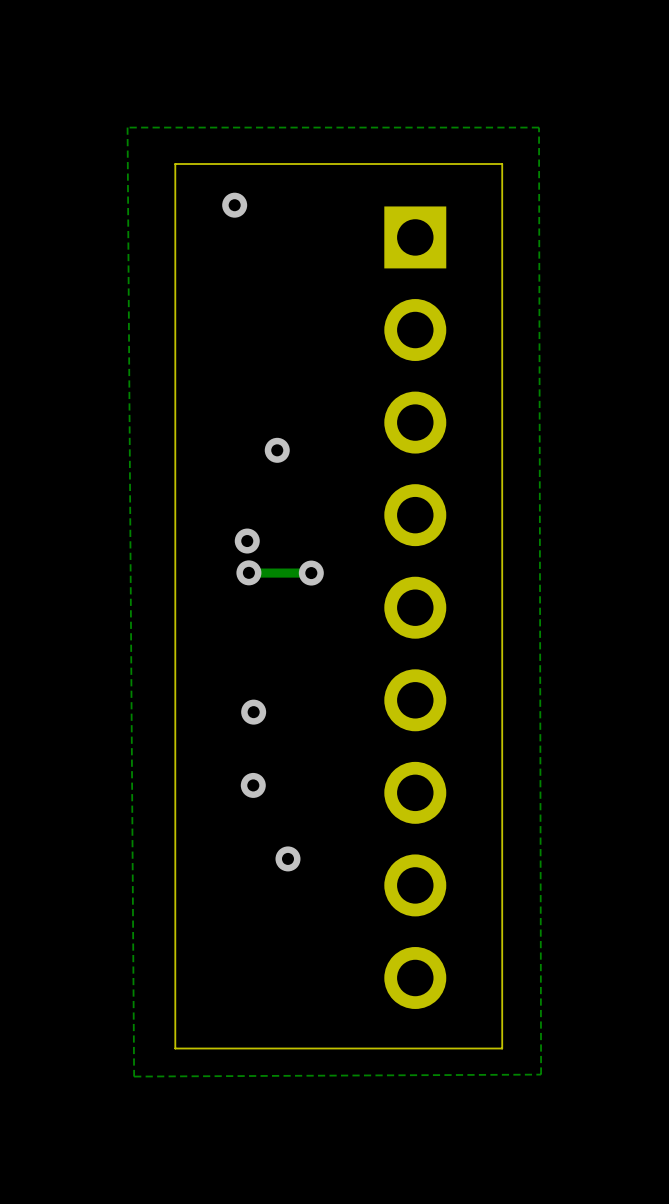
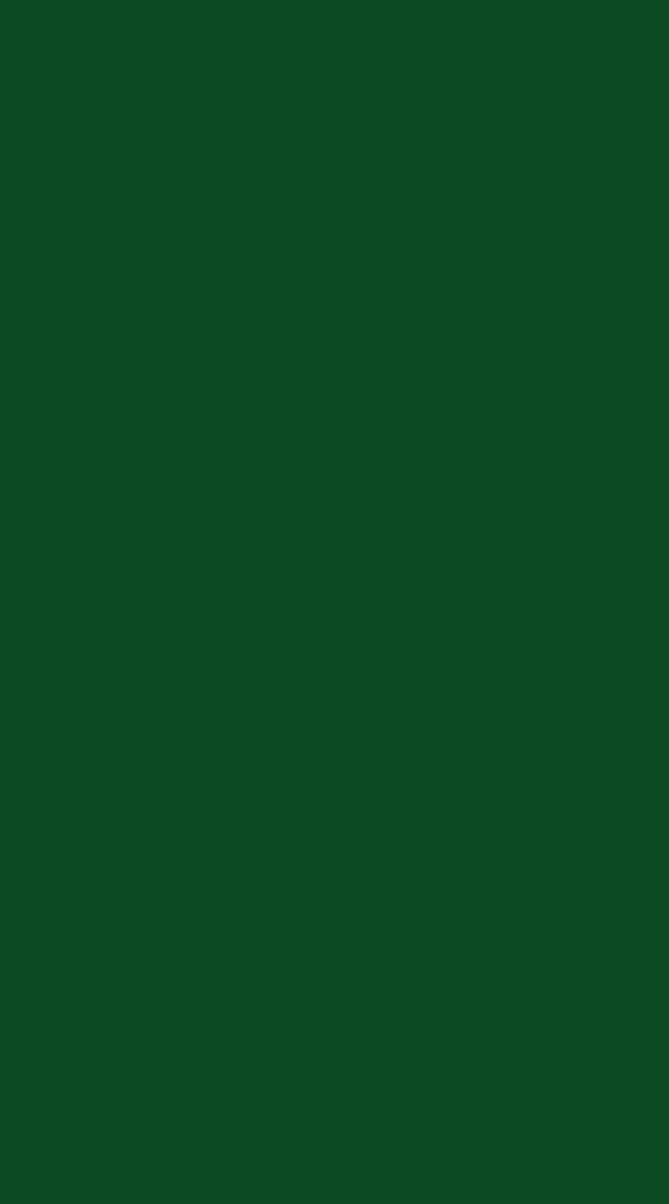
zone outline: (539, 127) (127, 127) (134, 1076) (541, 1074) (539, 127) -> none
board edge: (502, 164) (502, 1048) (175, 1048) (175, 164) (502, 164) -> none
via: (234, 205) -> none
via: (277, 450) -> none
via: (247, 541) -> none
via: (248, 572) -> none
track: (311, 573) (249, 573) -> none
via: (311, 573) -> none
part: (415, 607) -> none
via: (253, 712) -> none
via: (253, 785) -> none
via: (287, 858) -> none

